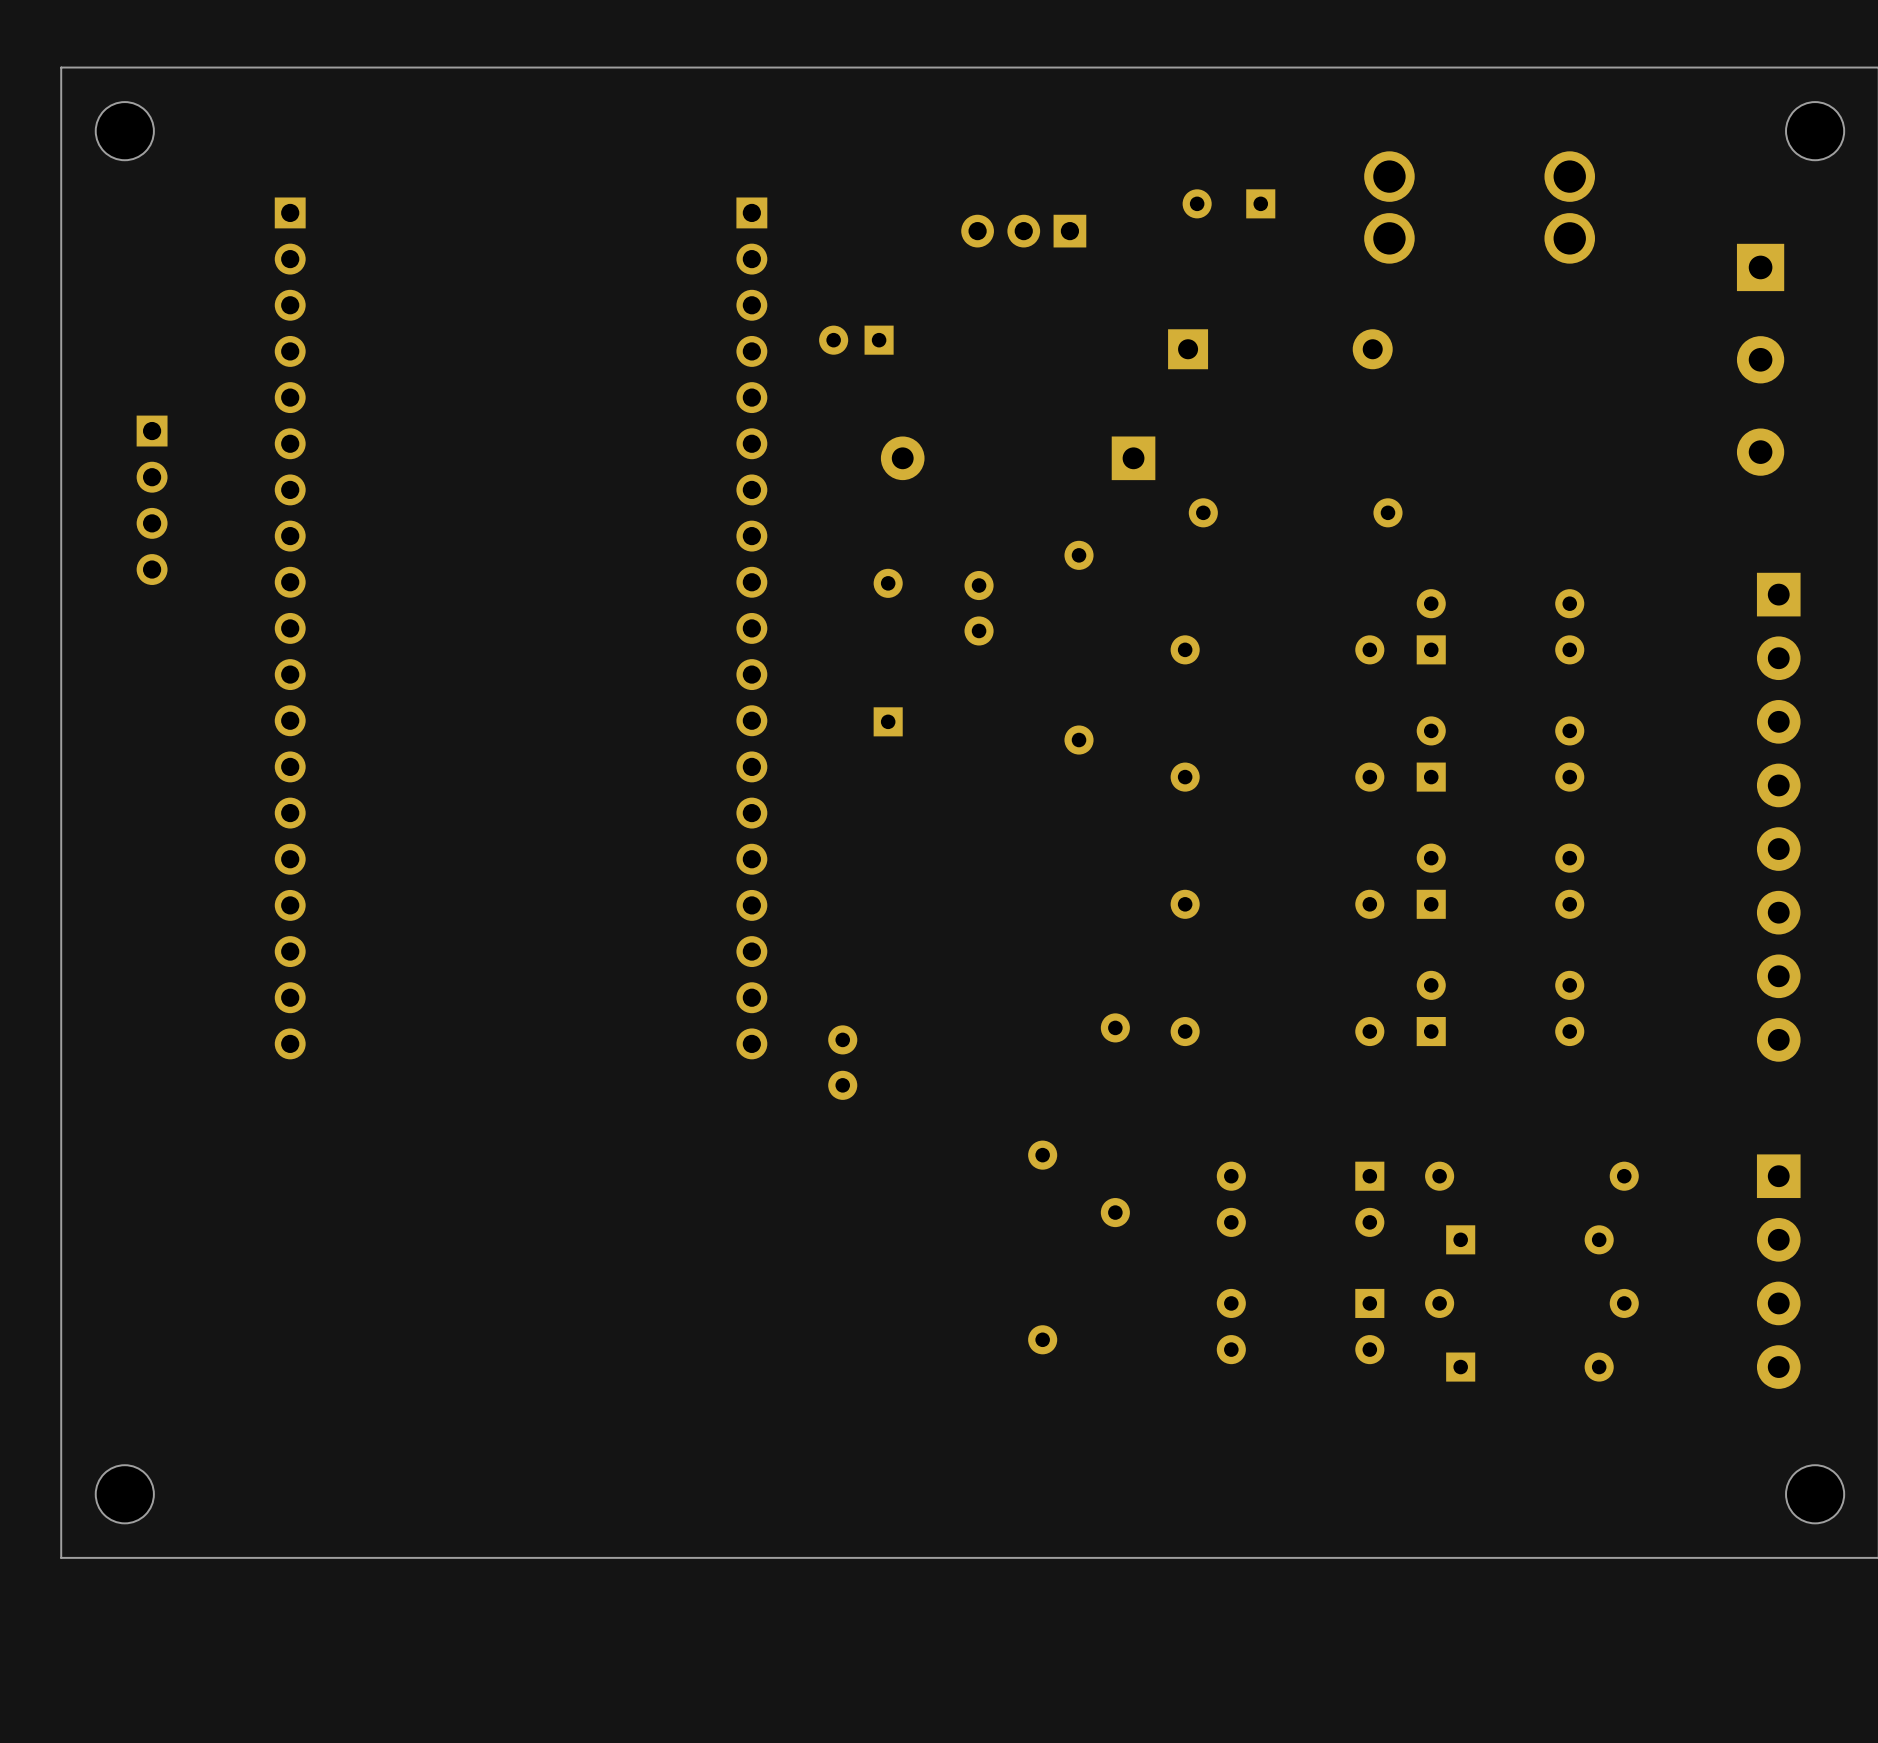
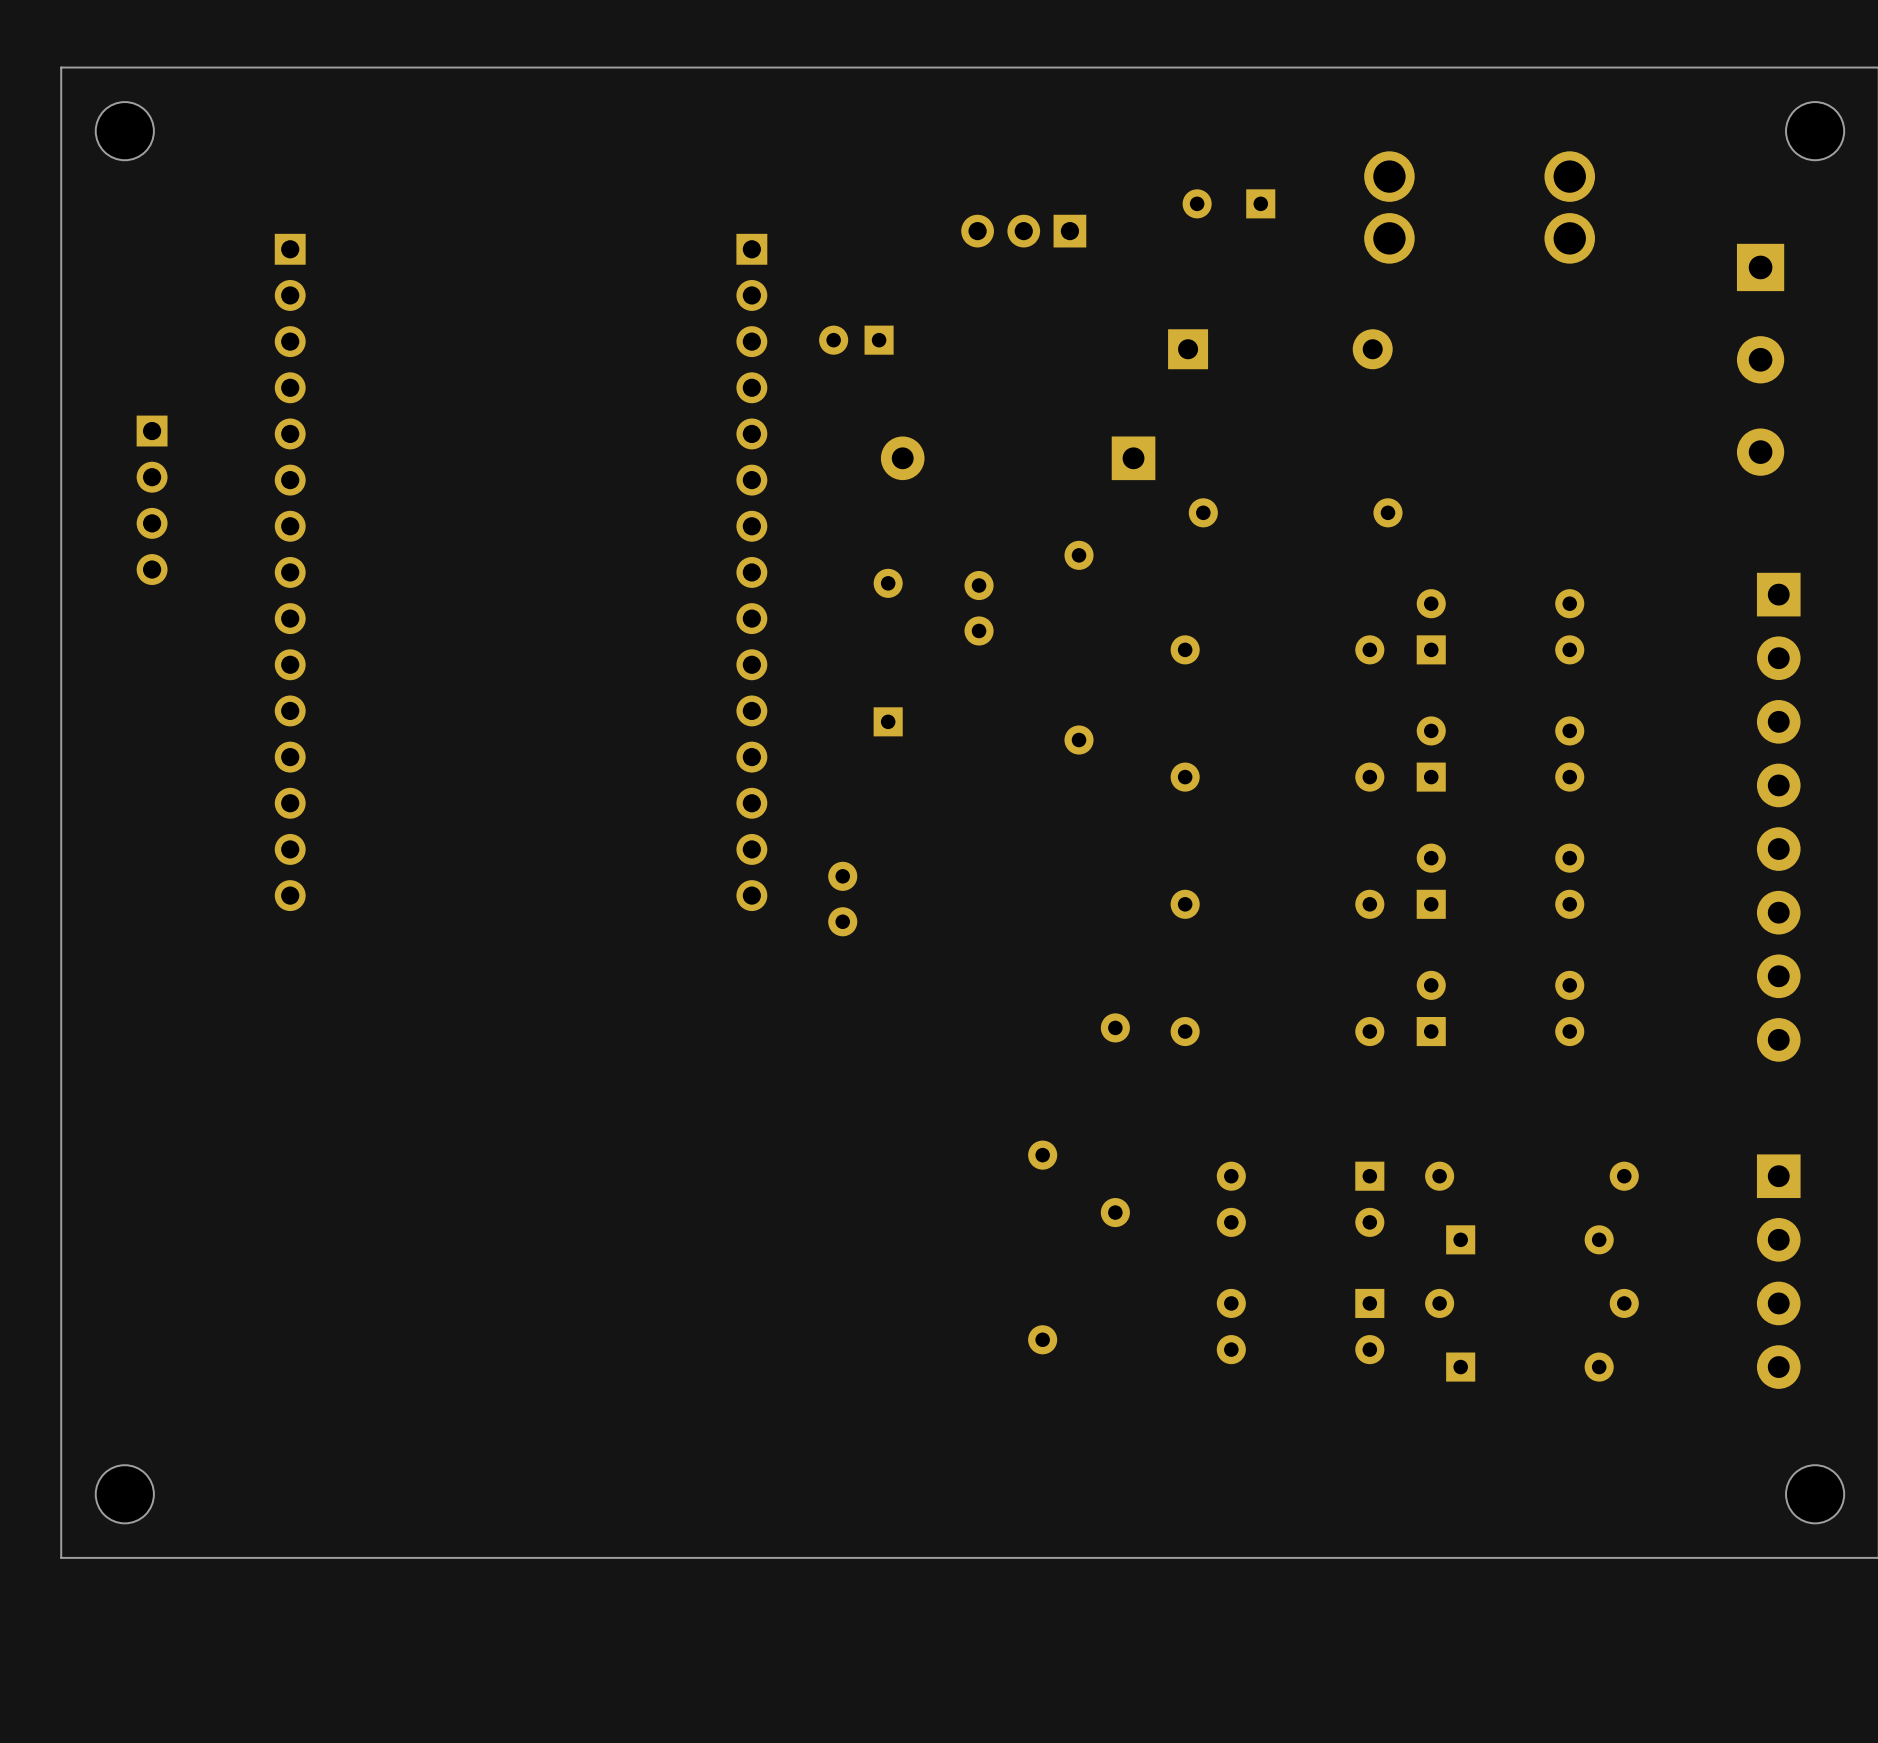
part: none -> (290, 572)
part: none -> (751, 572)
part: (290, 628) -> none
part: (751, 628) -> none
part position: (842, 1062) -> (842, 899)

